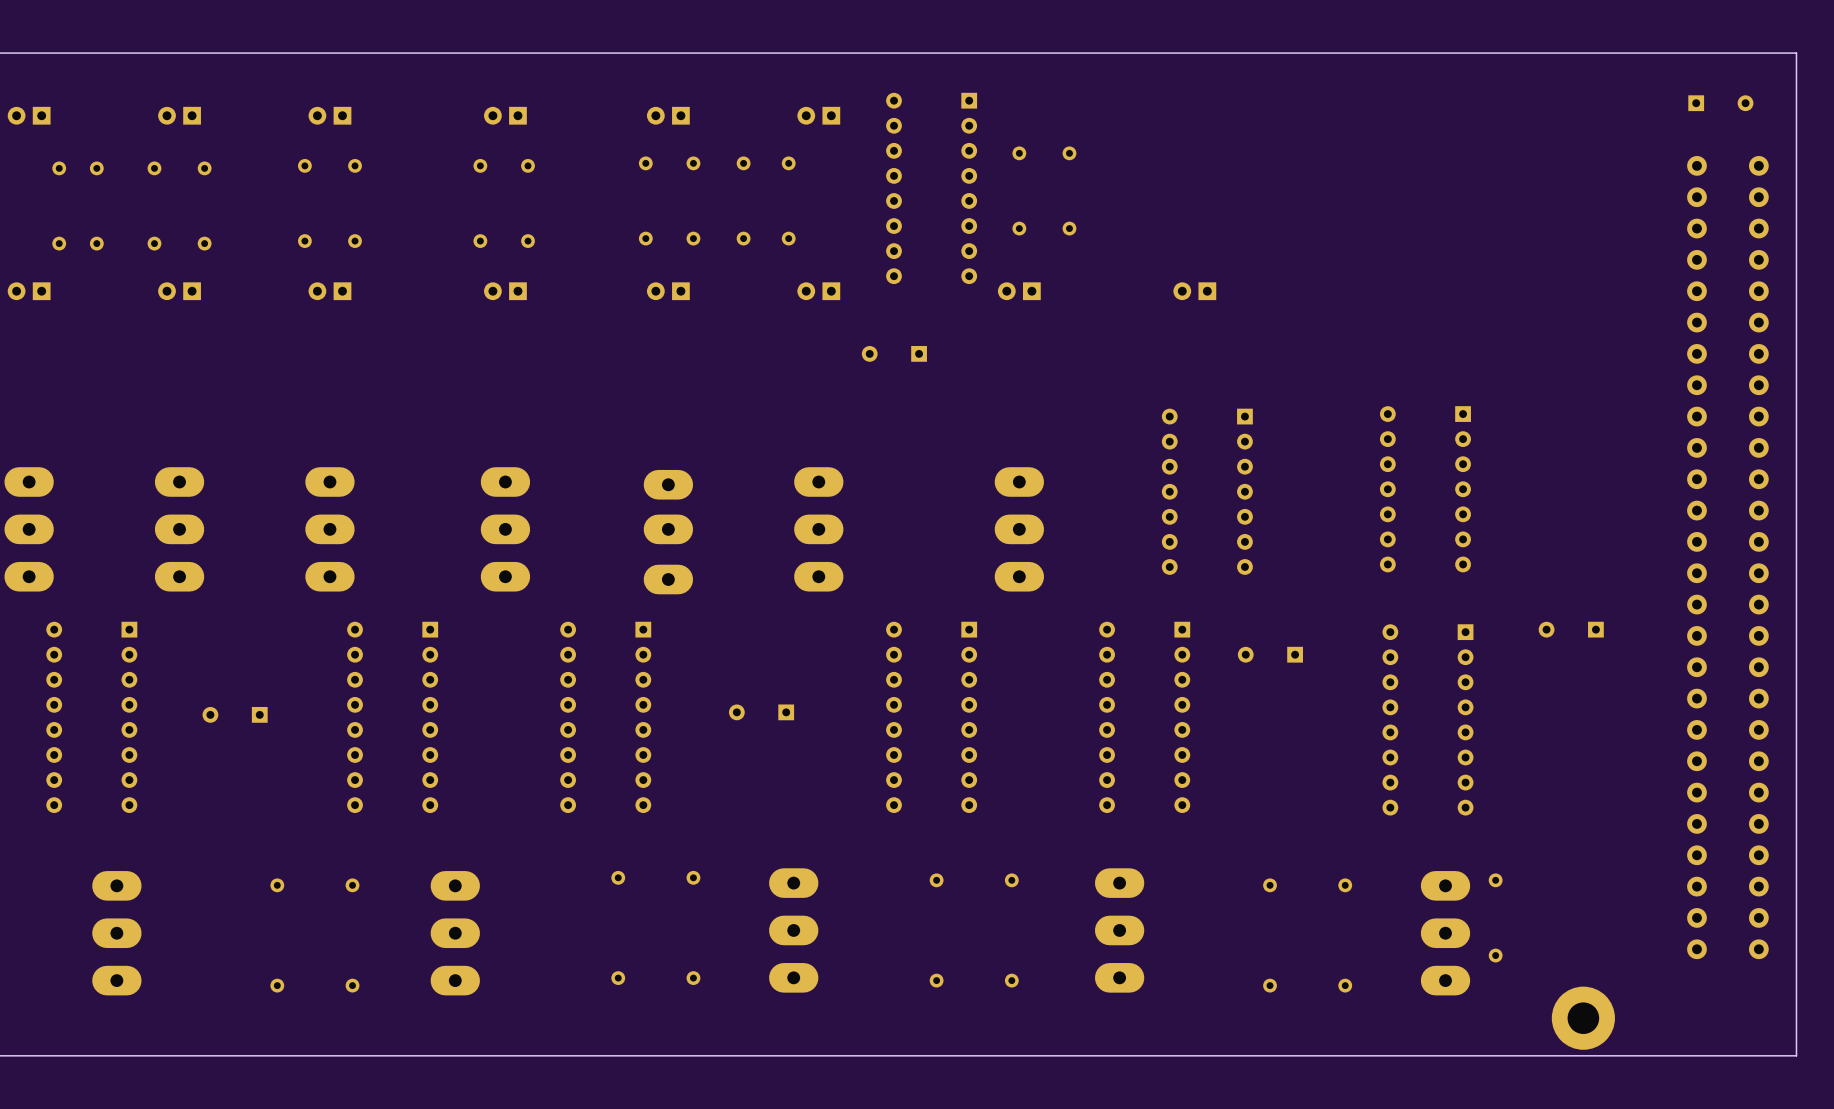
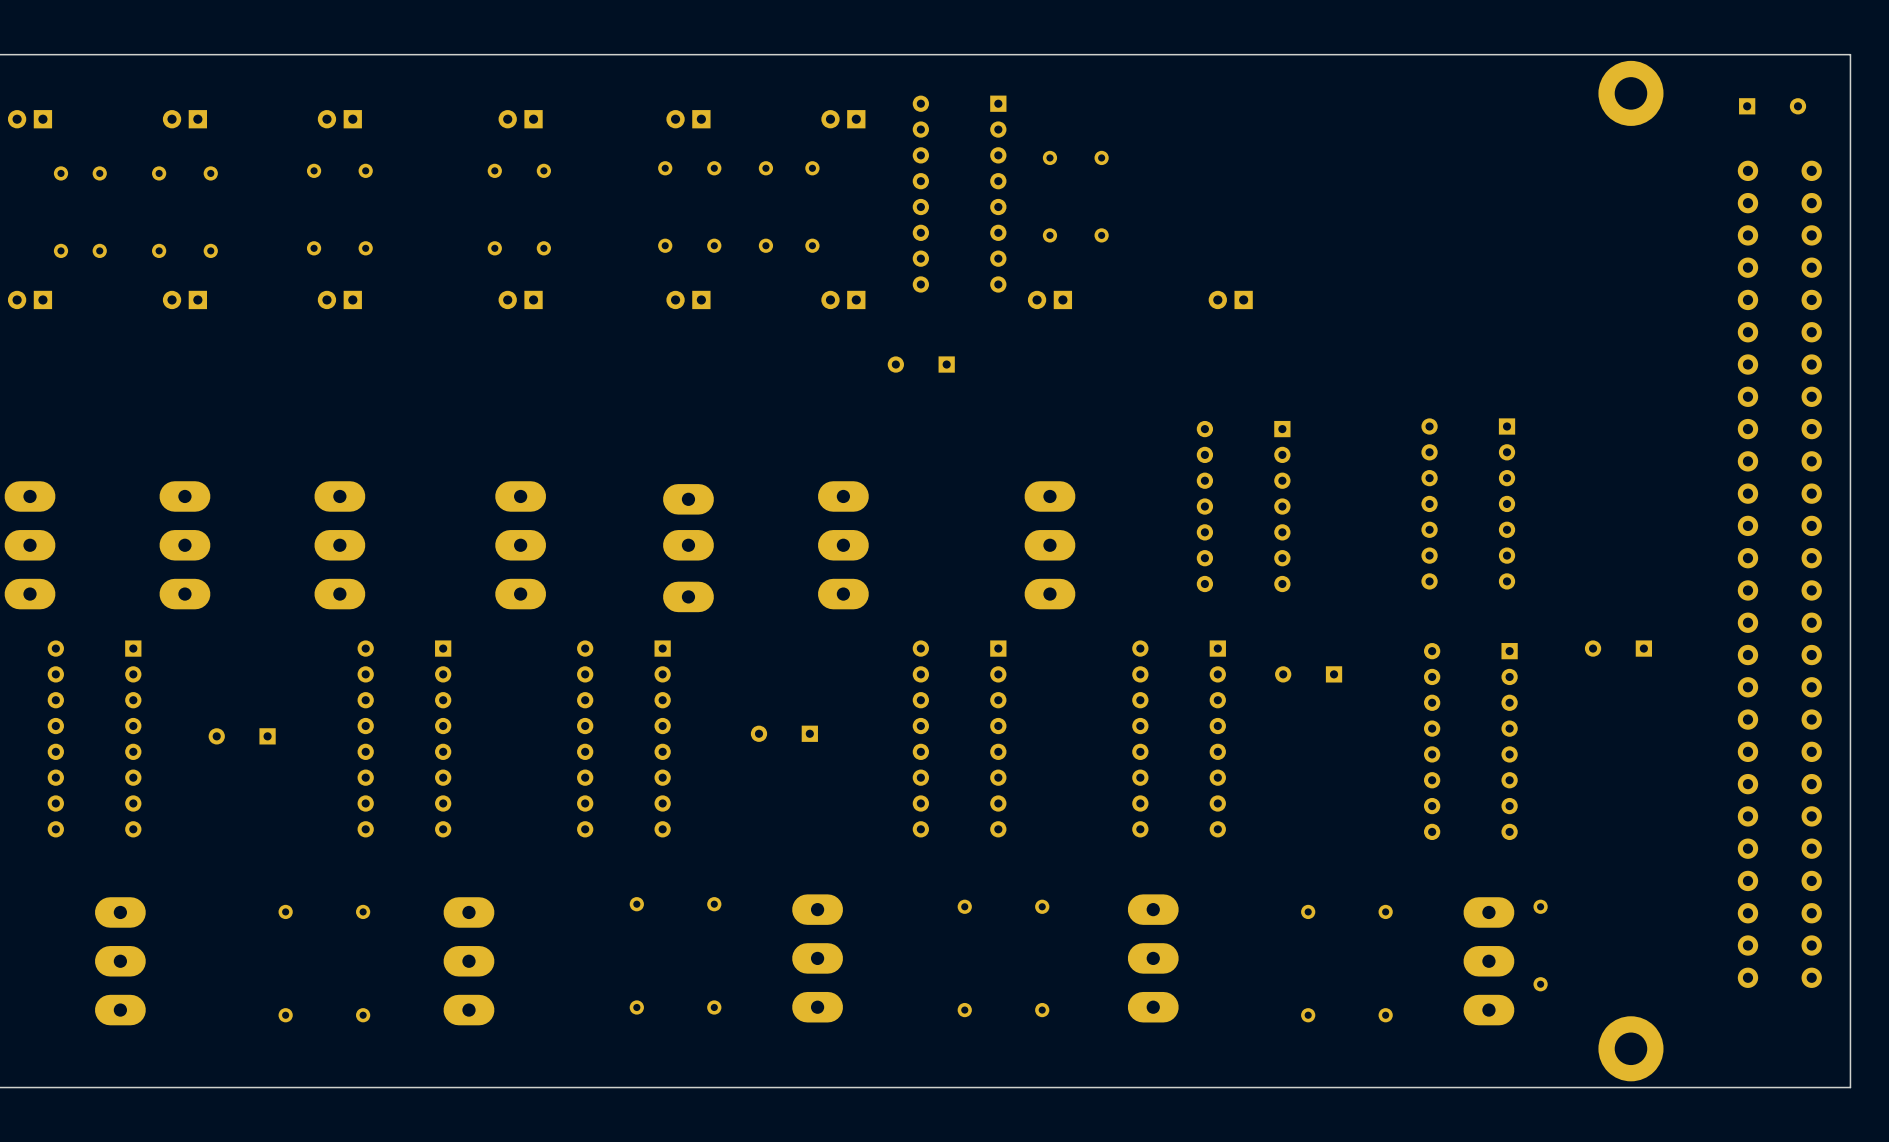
part: none -> (1630, 93)

